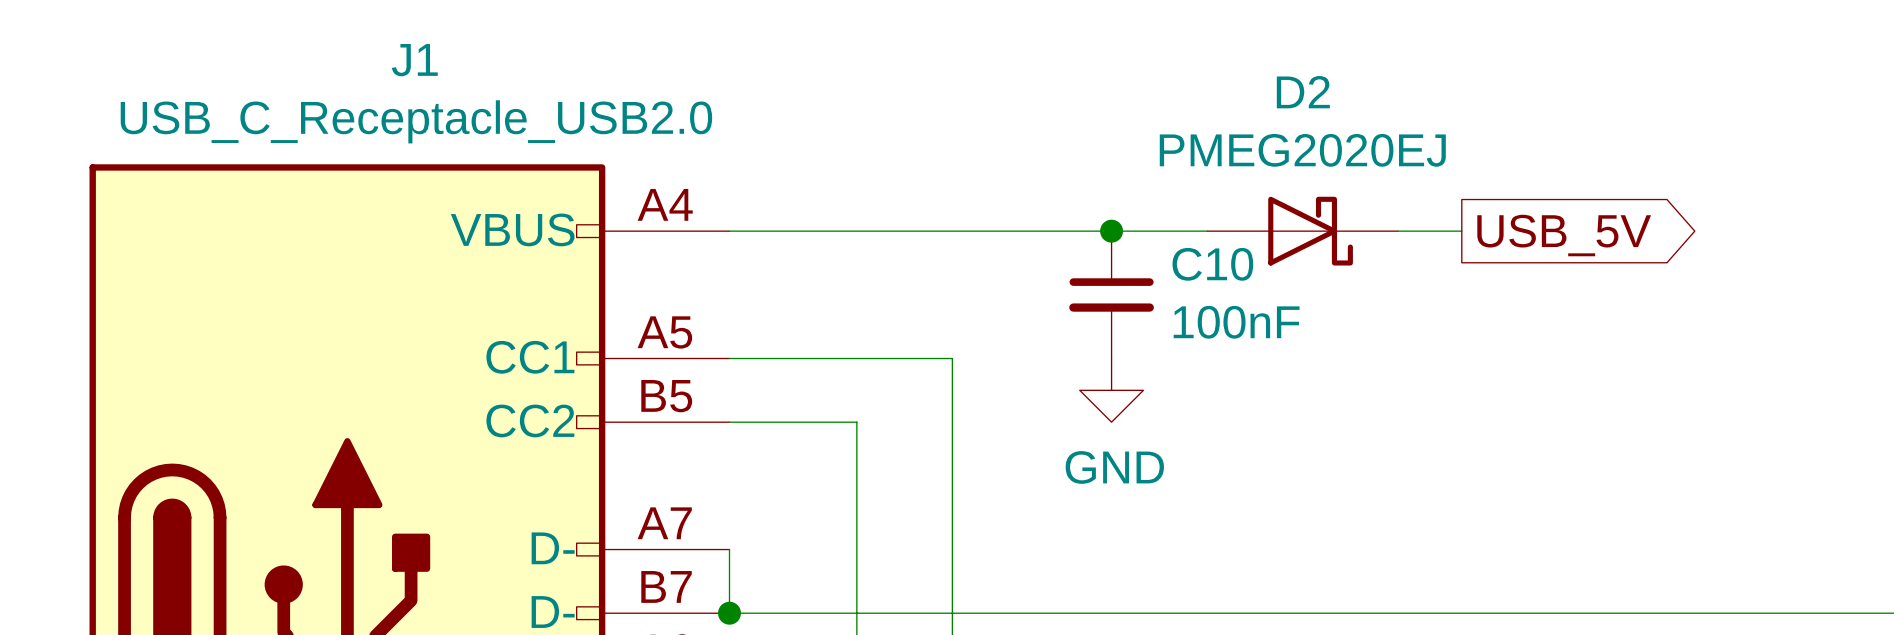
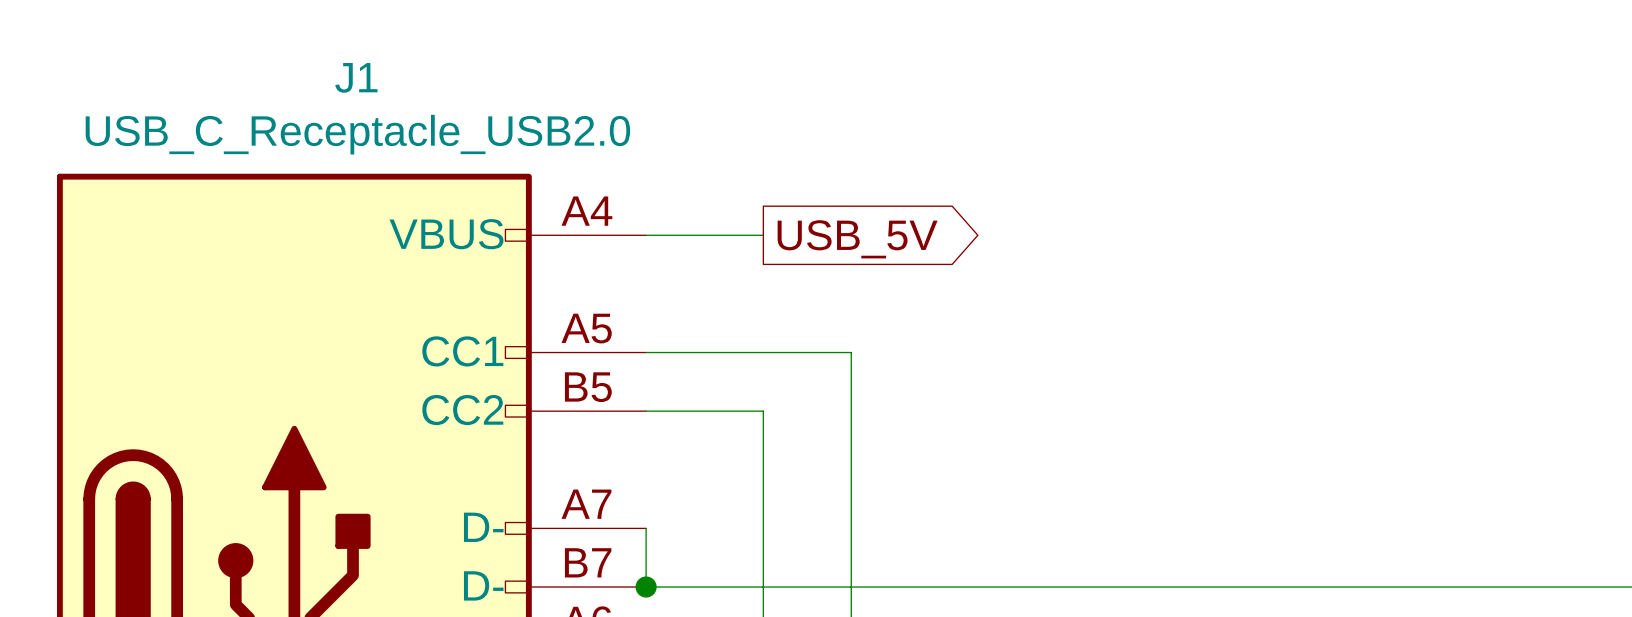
wire: (856, 231) (1207, 231) -> none
junction: (1111, 231) -> none
D2: PMEG2020EJ (1302, 231) -> none
wire: (1398, 231) (1461, 231) -> none
global label position: USB_5V (1564, 235) -> USB_5V (857, 239)
C10: 100nF (1111, 294) -> none
power symbol: GND (1111, 390) -> none

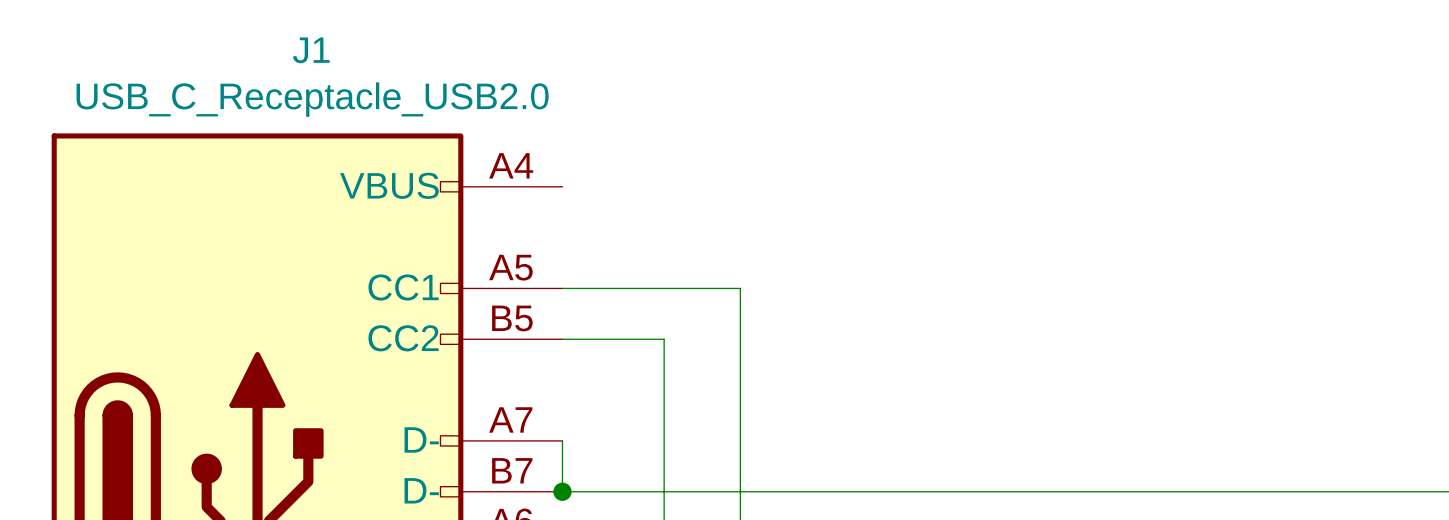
wire: (646, 235) (763, 235) -> none
global label: USB_5V (857, 239) -> none

